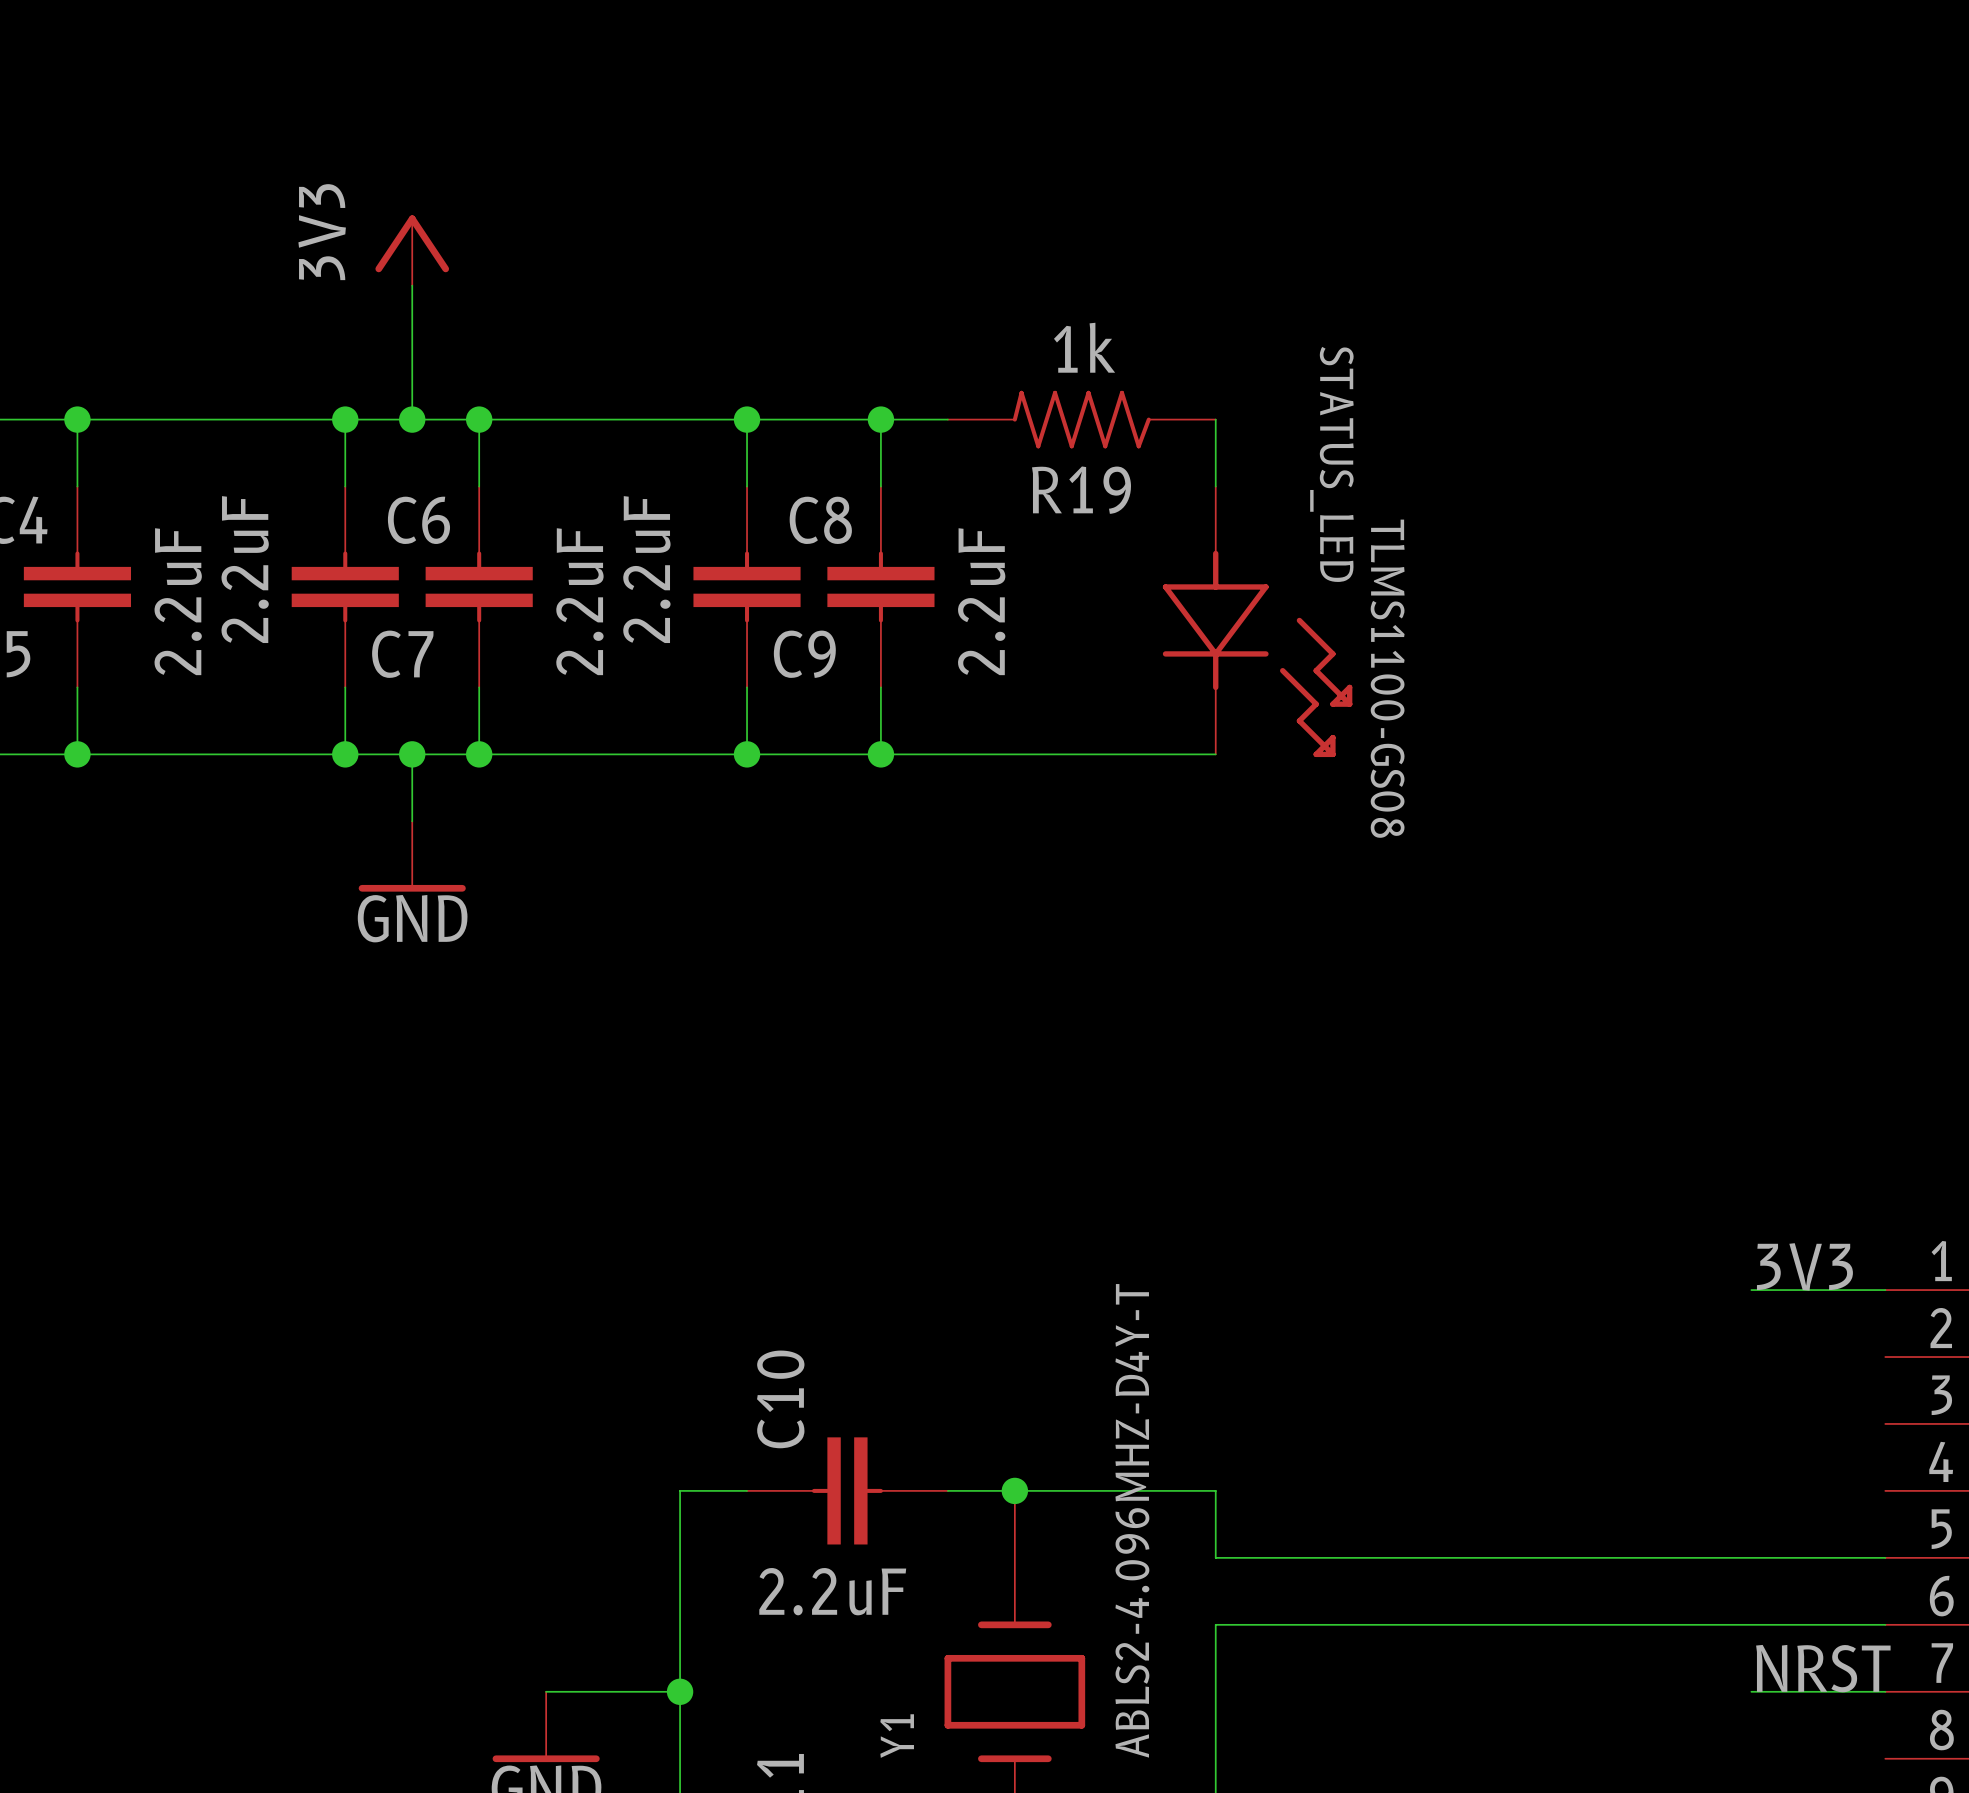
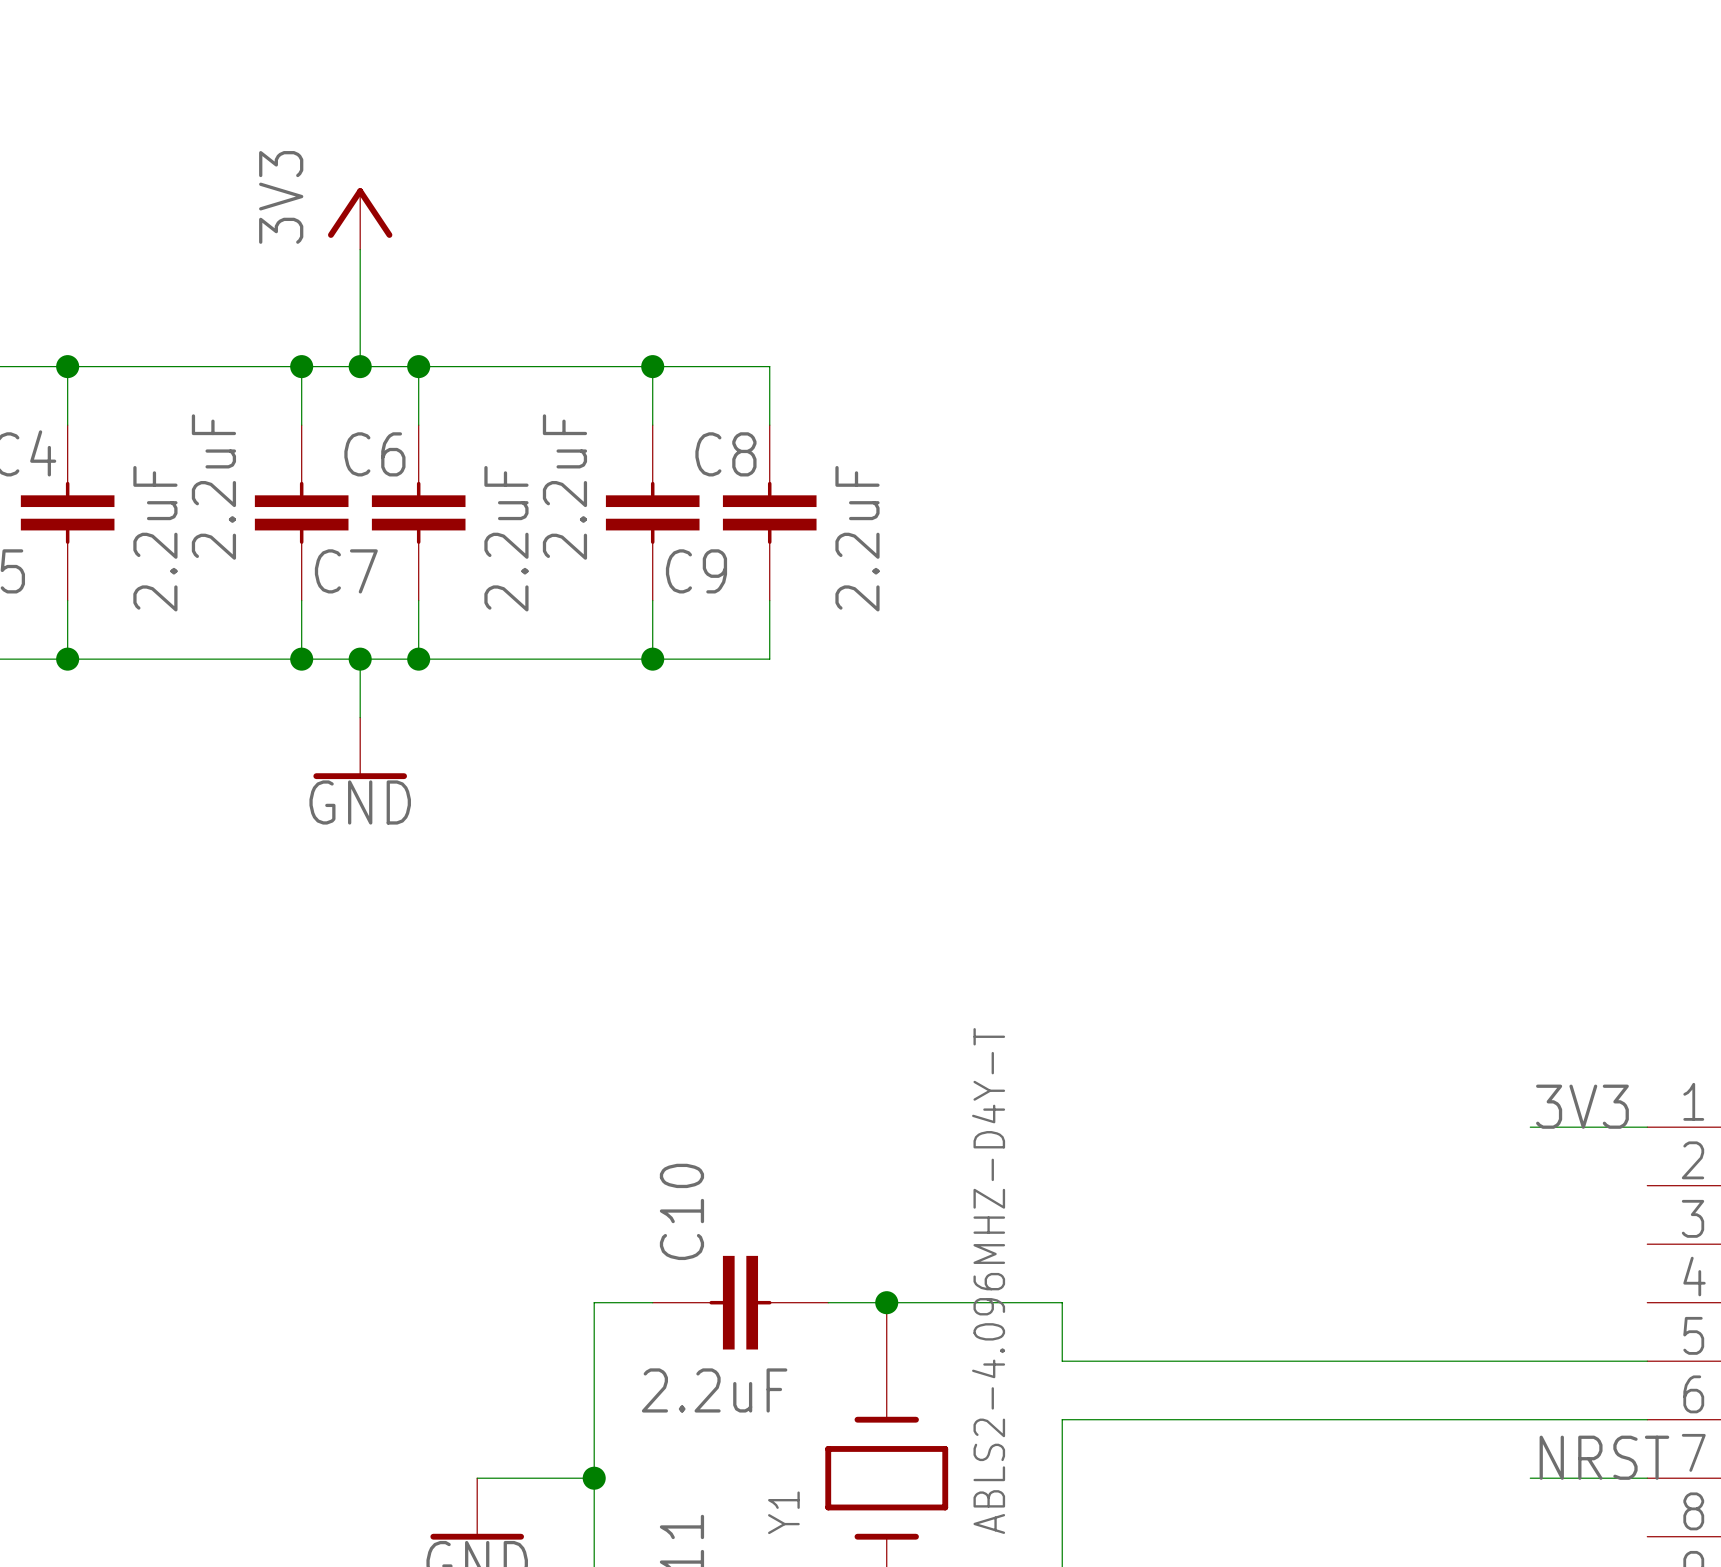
wire: (880, 419) (947, 419) -> none
junction: (880, 419) -> none
R19: 1k (1081, 419) -> none
wire: (1215, 419) (1215, 486) -> none
STATUS_LED: TLMS1100-GS08 (1257, 621) -> none
wire: (880, 754) (1215, 754) -> none
junction: (880, 754) -> none

